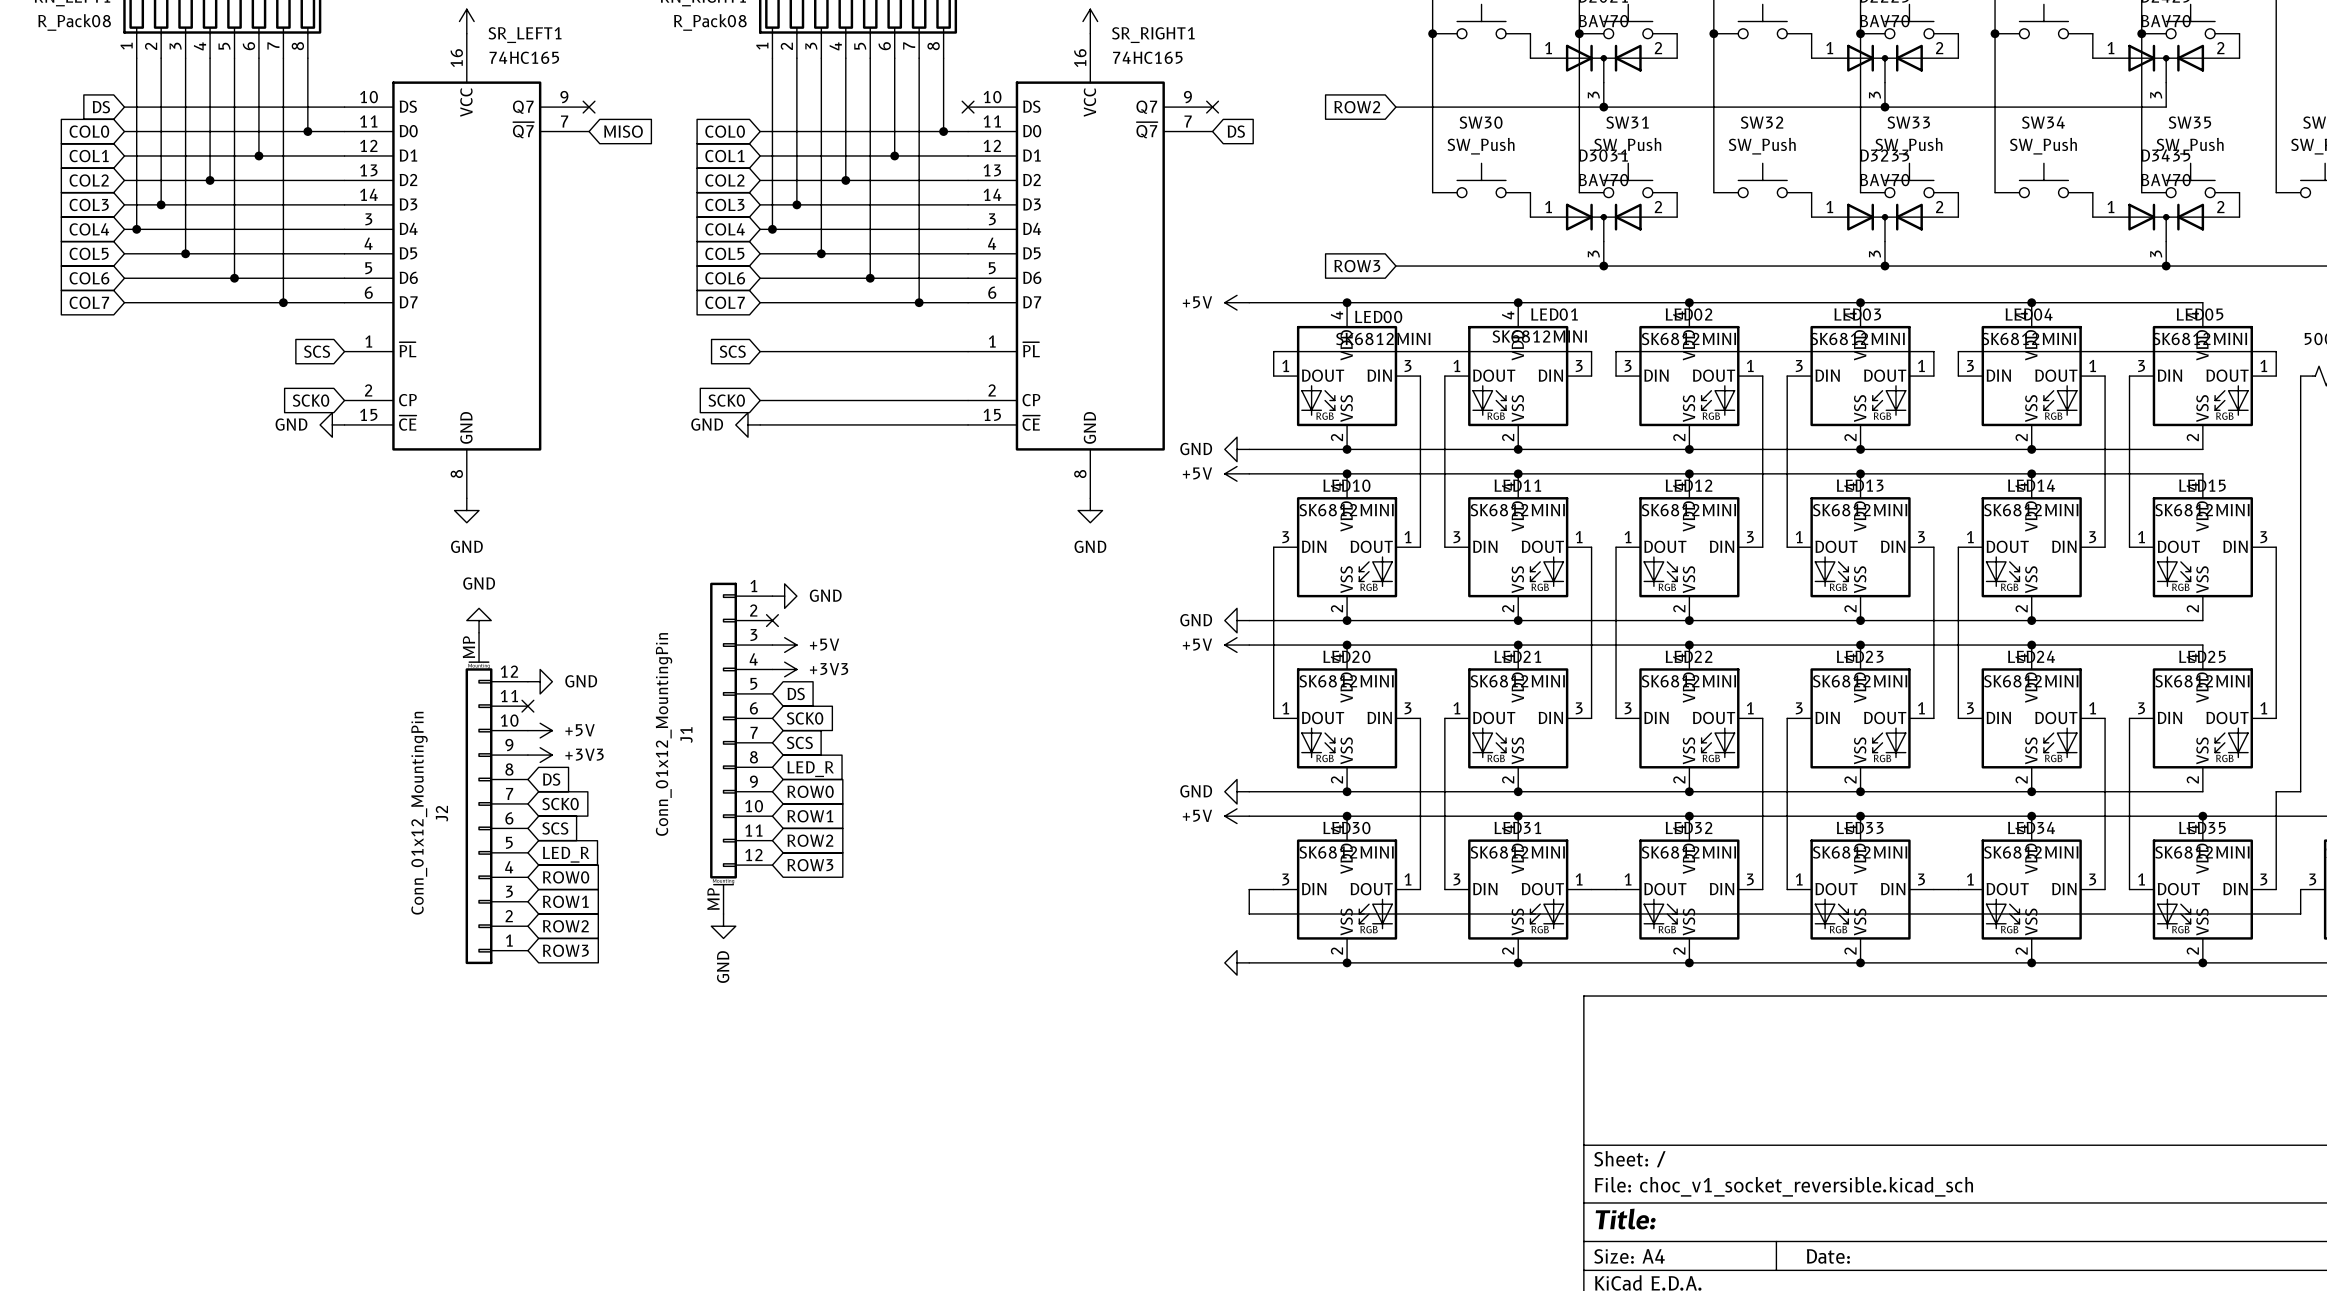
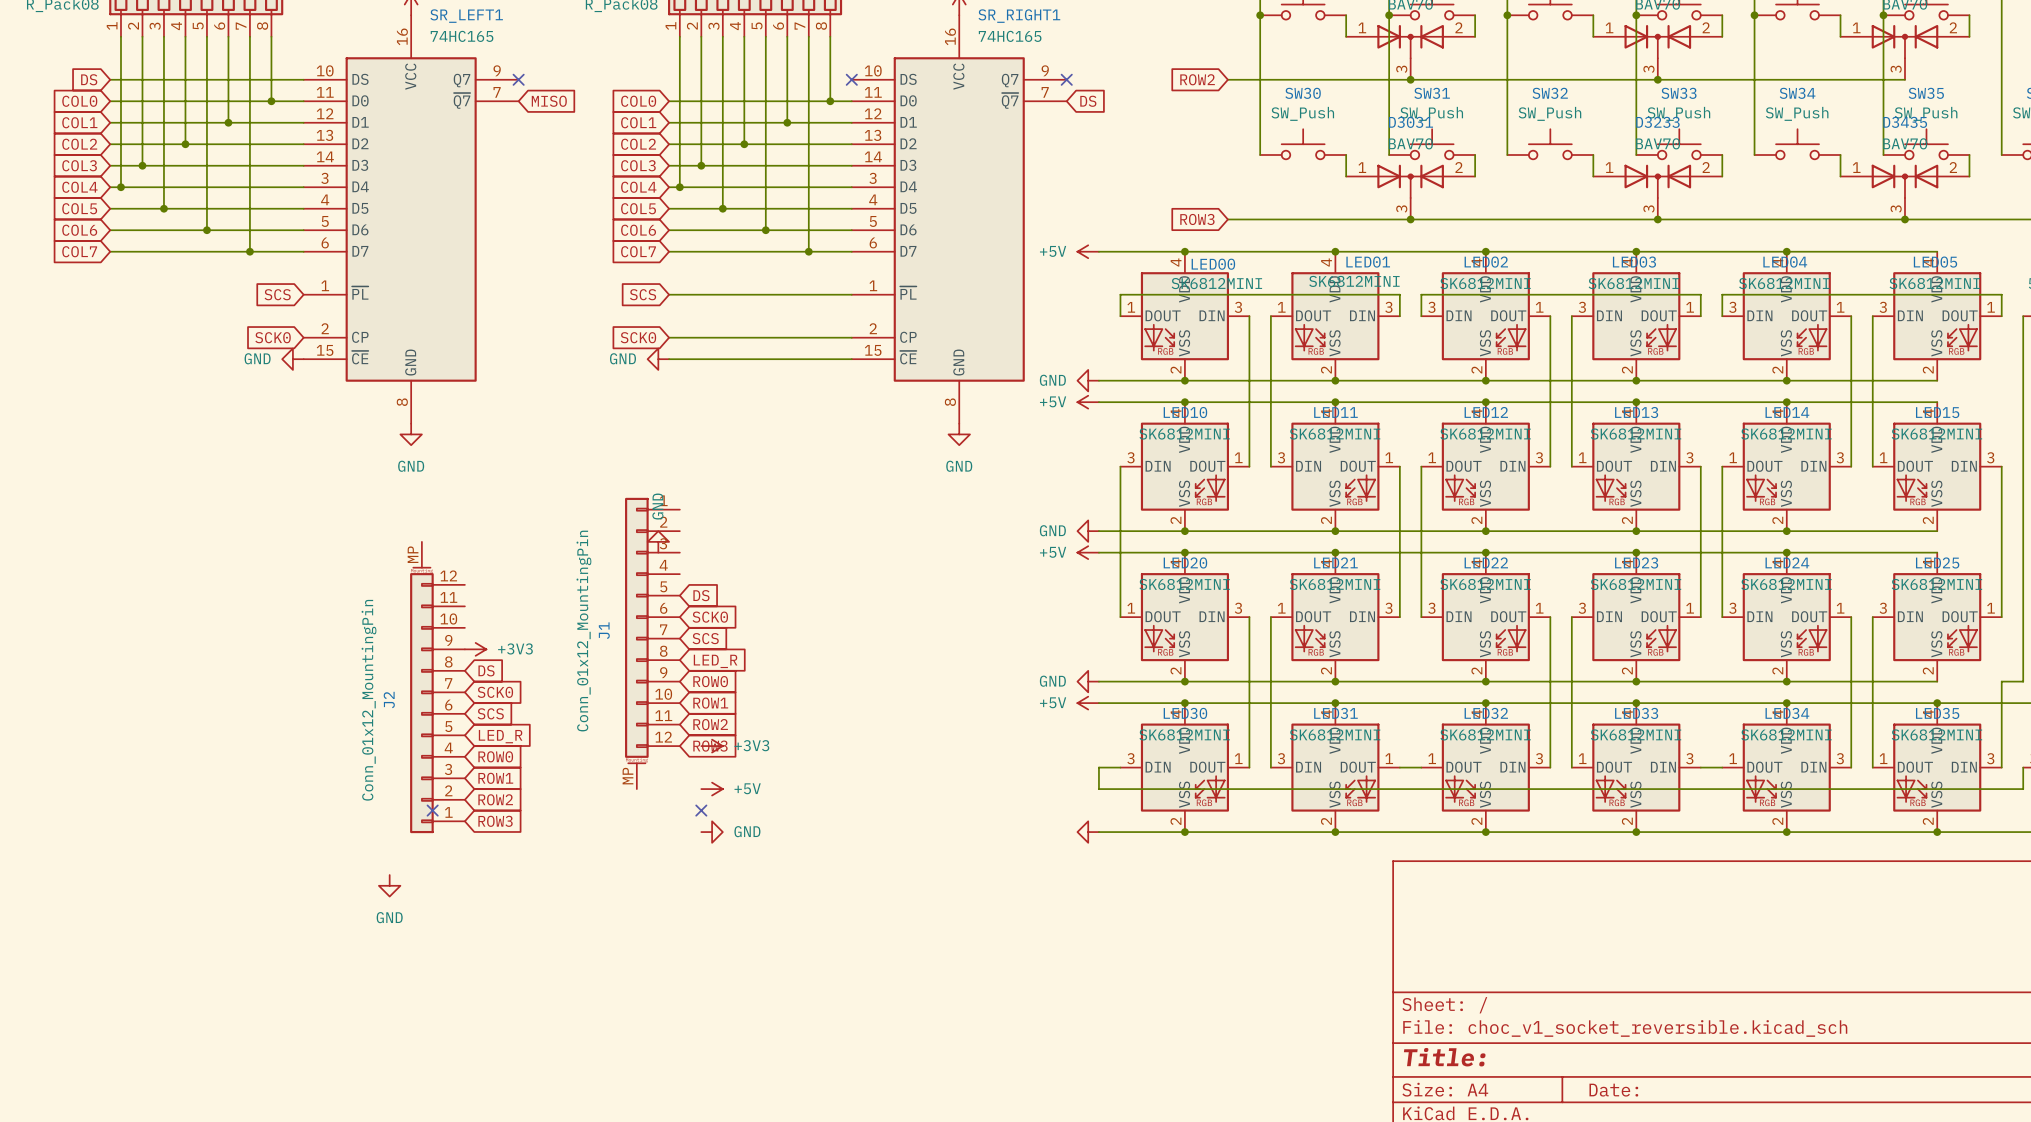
power symbol rotation: 0° (784, 596) -> 90° counterclockwise (658, 541)
power symbol position: GND (784, 596) -> GND (658, 541)
power symbol: GND (479, 620) -> none
no-connect mark: (772, 620) -> none
power symbol: +5V (784, 645) -> none
power symbol position: +3V3 (784, 669) -> +3V3 (712, 746)
power symbol: GND (540, 681) -> none
no-connect mark: (527, 706) -> none
power symbol: +5V (540, 730) -> none
power symbol: none -> +5V (712, 789)
power symbol rotation: 0° (723, 926) -> 90° counterclockwise (712, 832)
power symbol position: GND (723, 926) -> GND (712, 832)
no-connect mark: none -> (432, 810)
no-connect mark: none -> (701, 810)
power symbol: none -> GND (389, 885)

